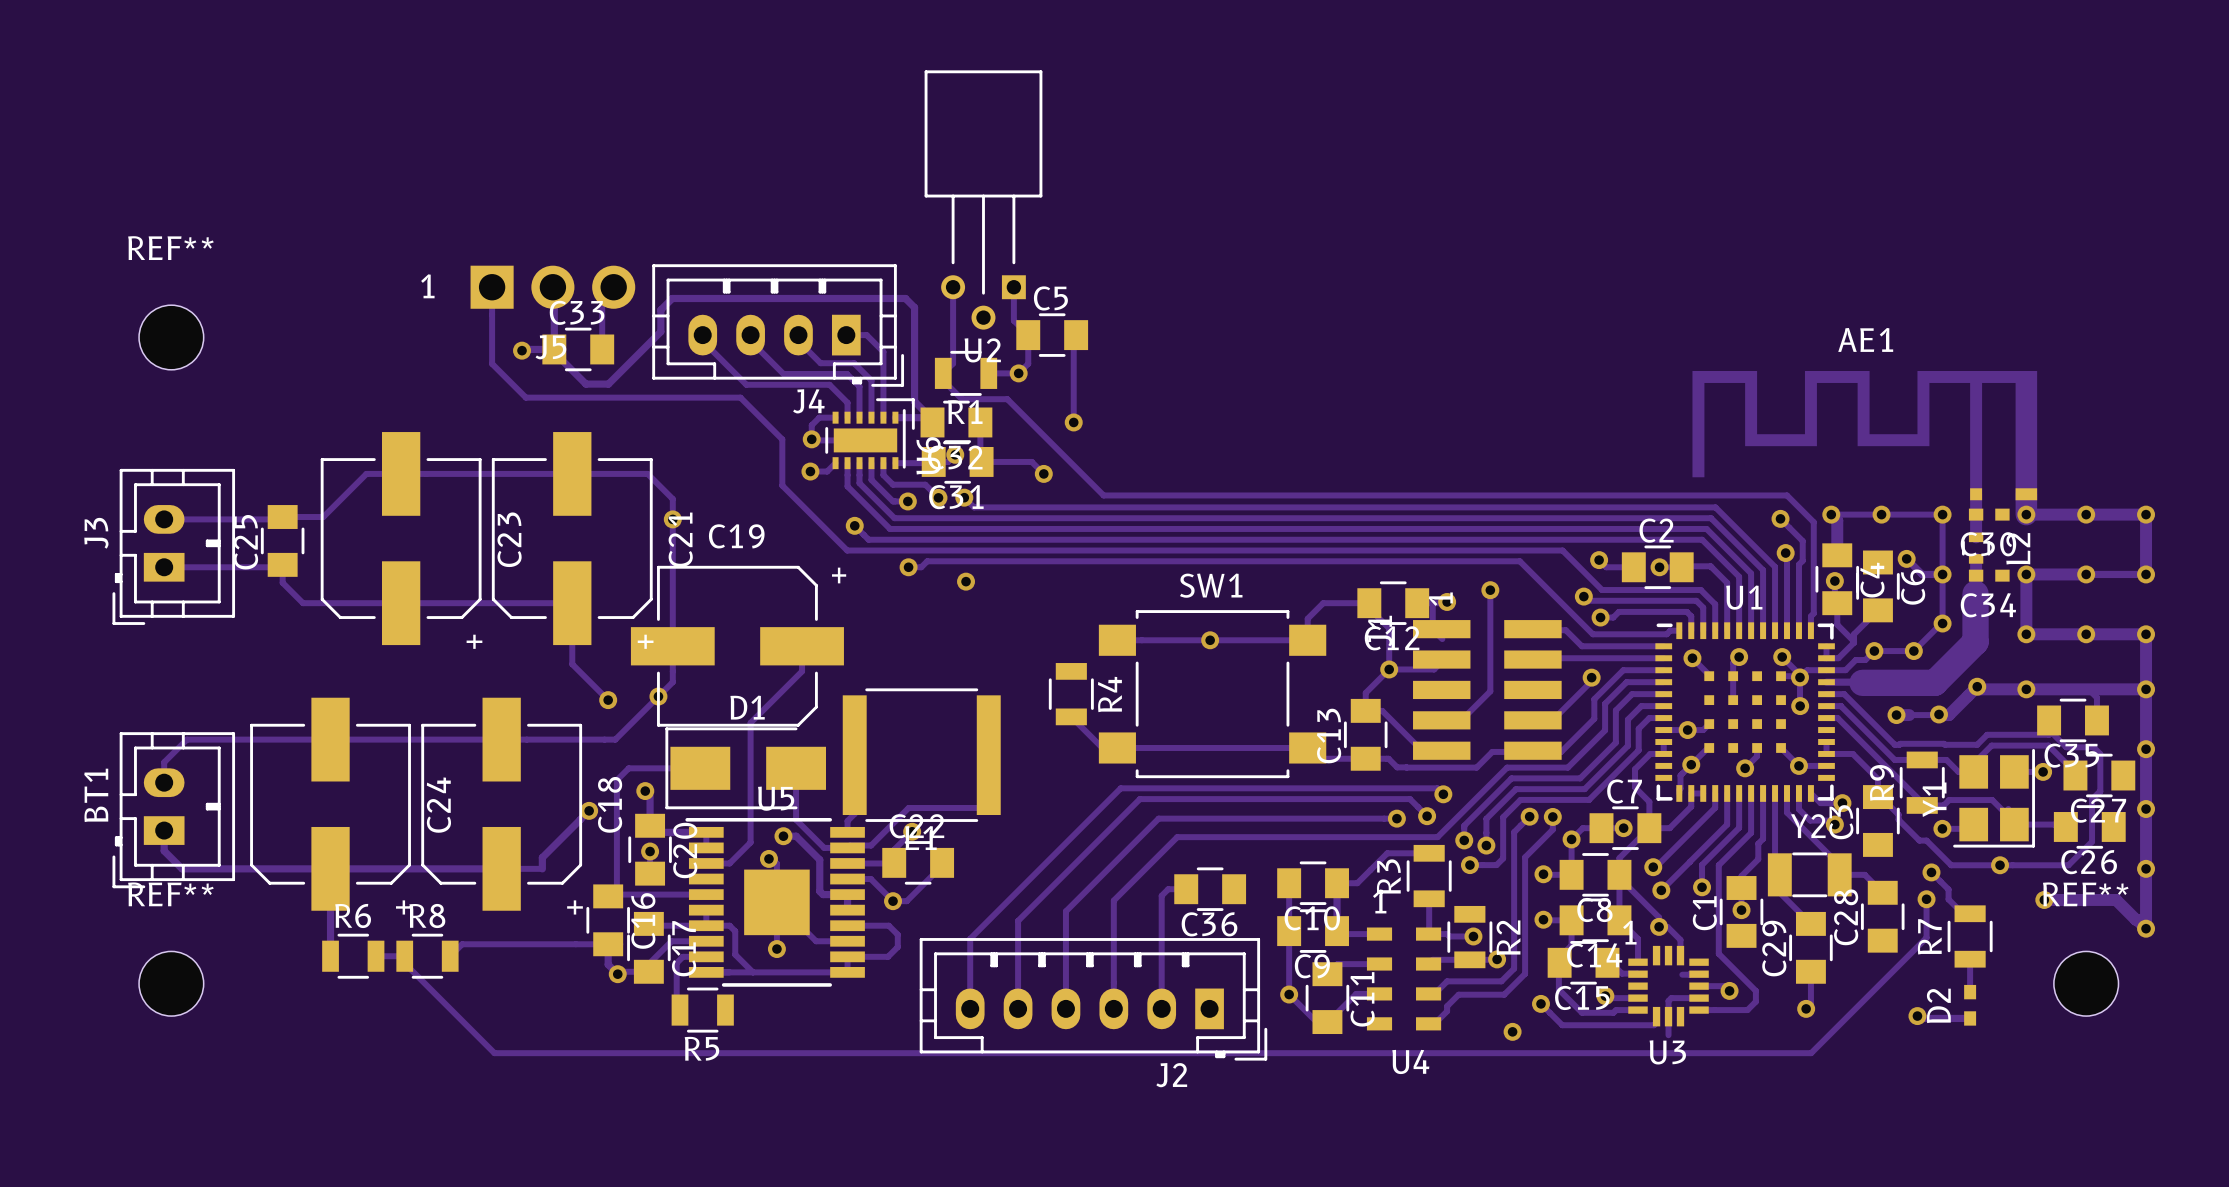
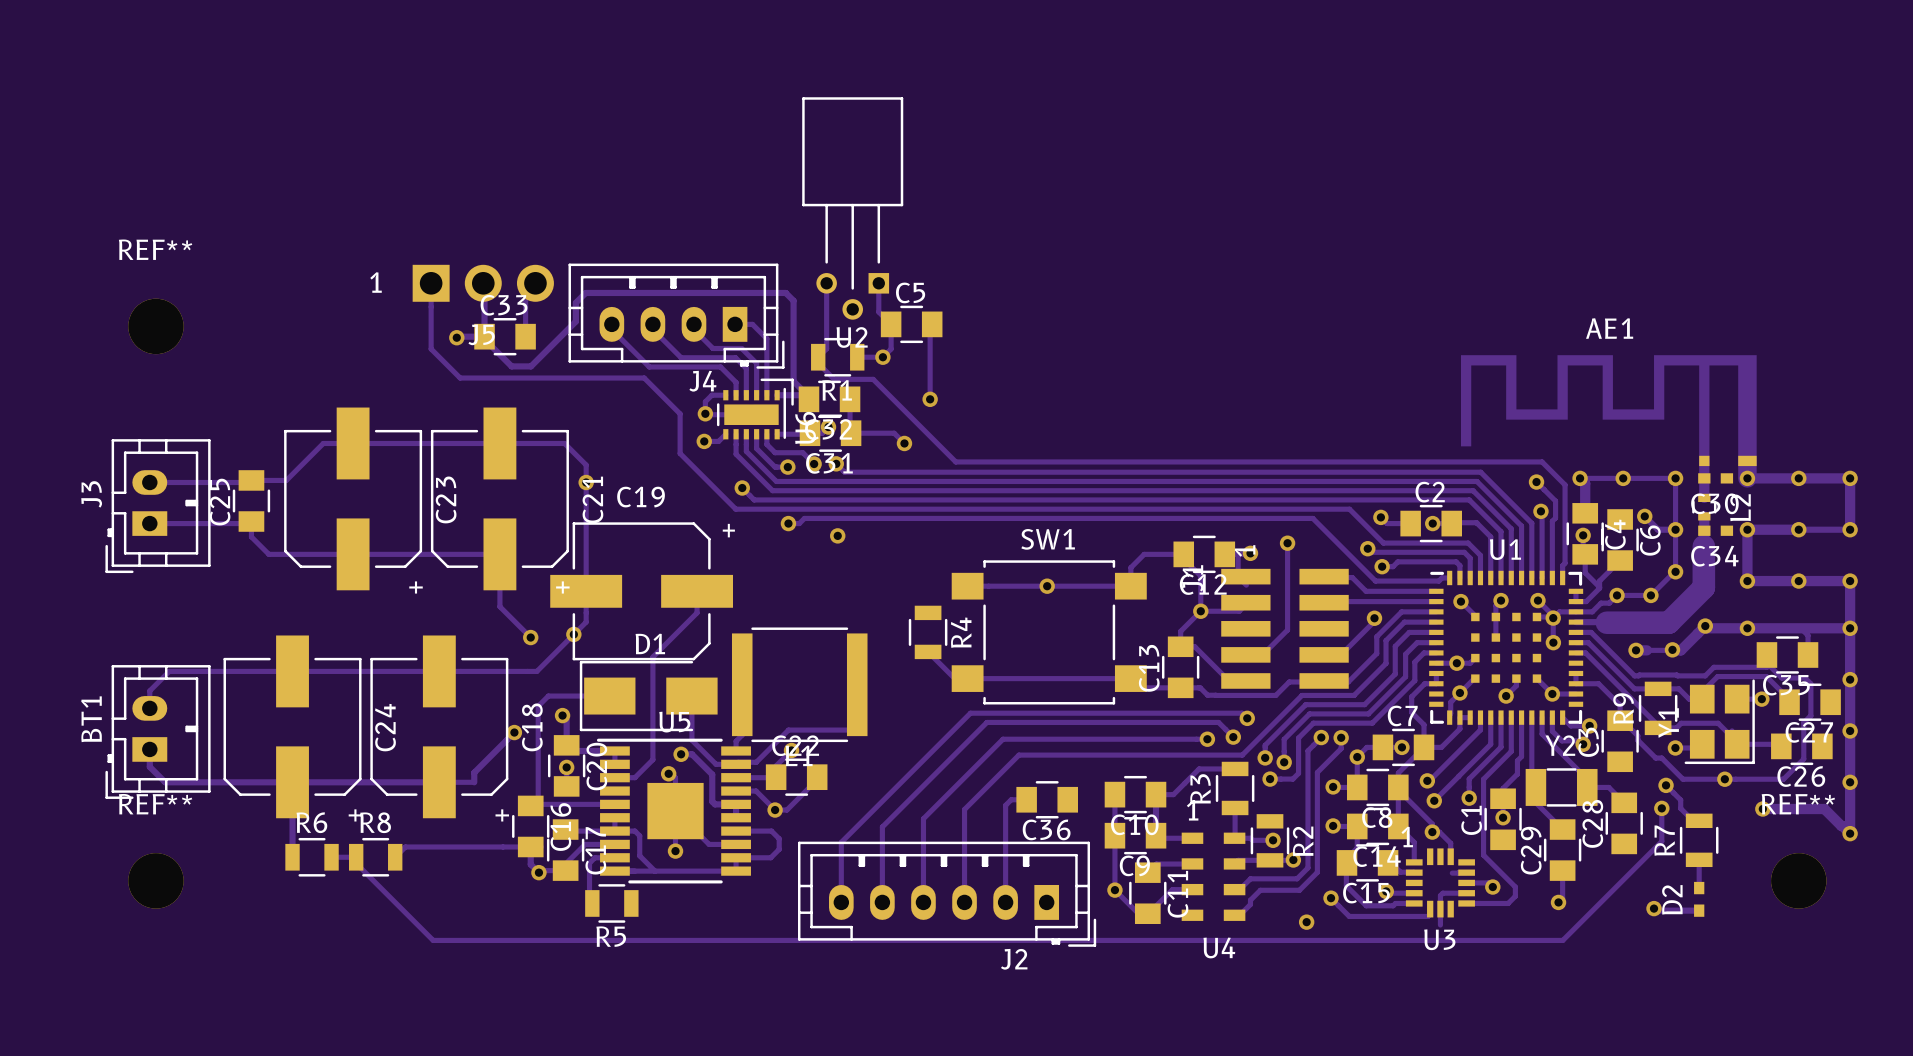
REF** footprint: [139, 305, 204, 370] -> [128, 298, 184, 355]
REF** footprint: [139, 951, 204, 1017] -> [128, 853, 184, 909]
REF** footprint: [2053, 951, 2119, 1017] -> [1771, 853, 1827, 909]

